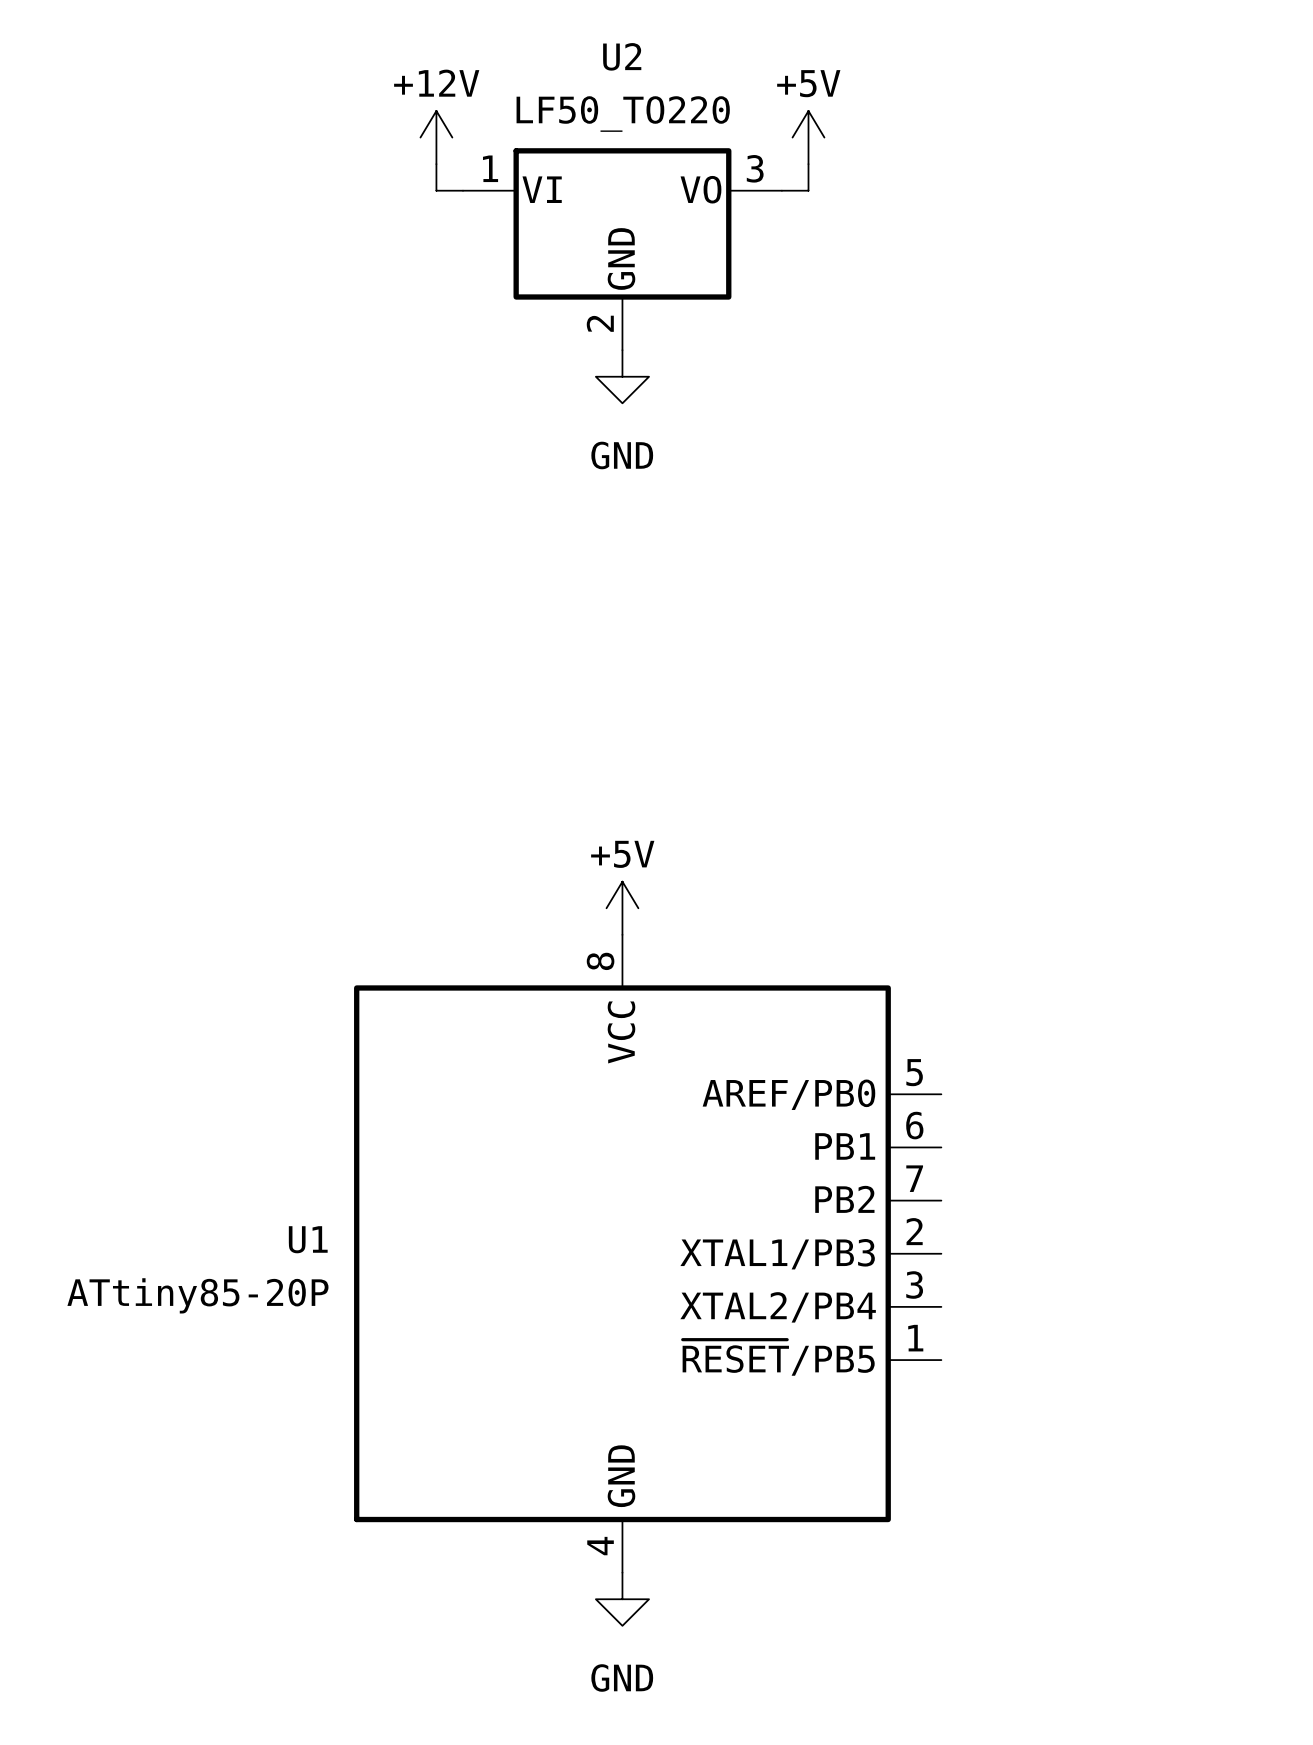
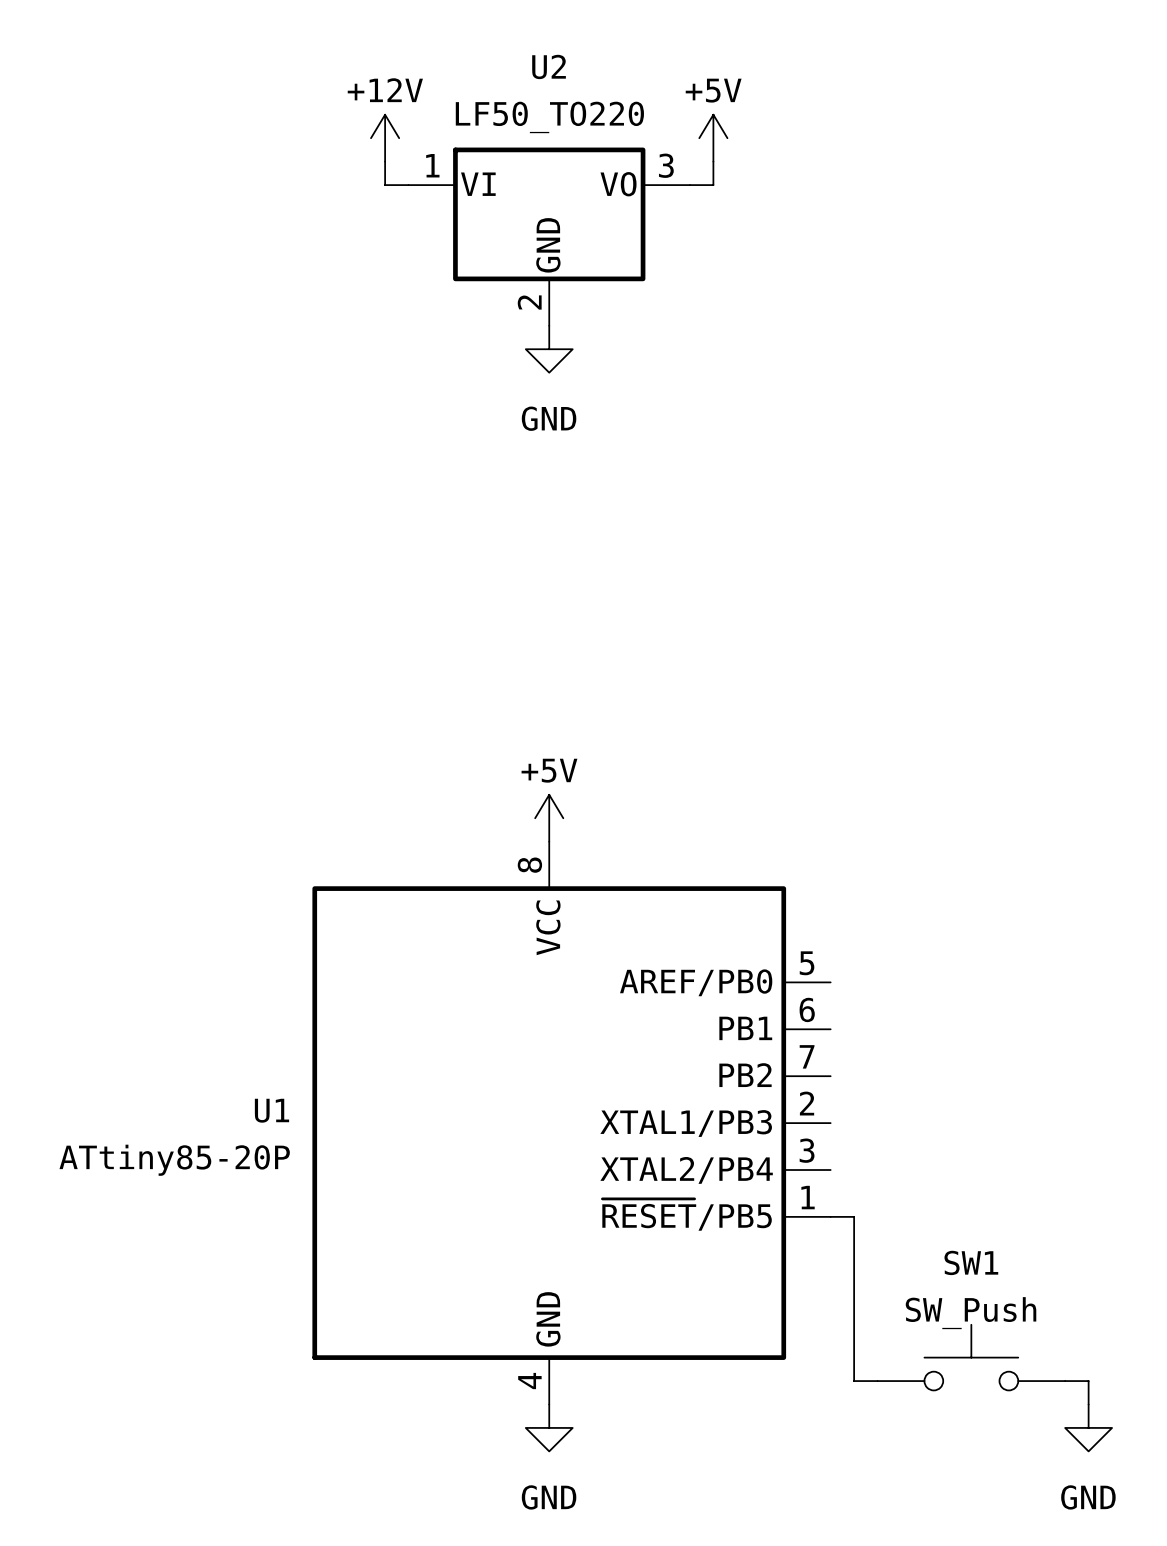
wire: none -> (830, 1216) (854, 1216) (854, 1381) (877, 1381)
SW1: none -> SW_Push (971, 1357)
wire: none -> (1065, 1381) (1088, 1381) (1088, 1404)
power symbol: none -> GND (1088, 1427)

